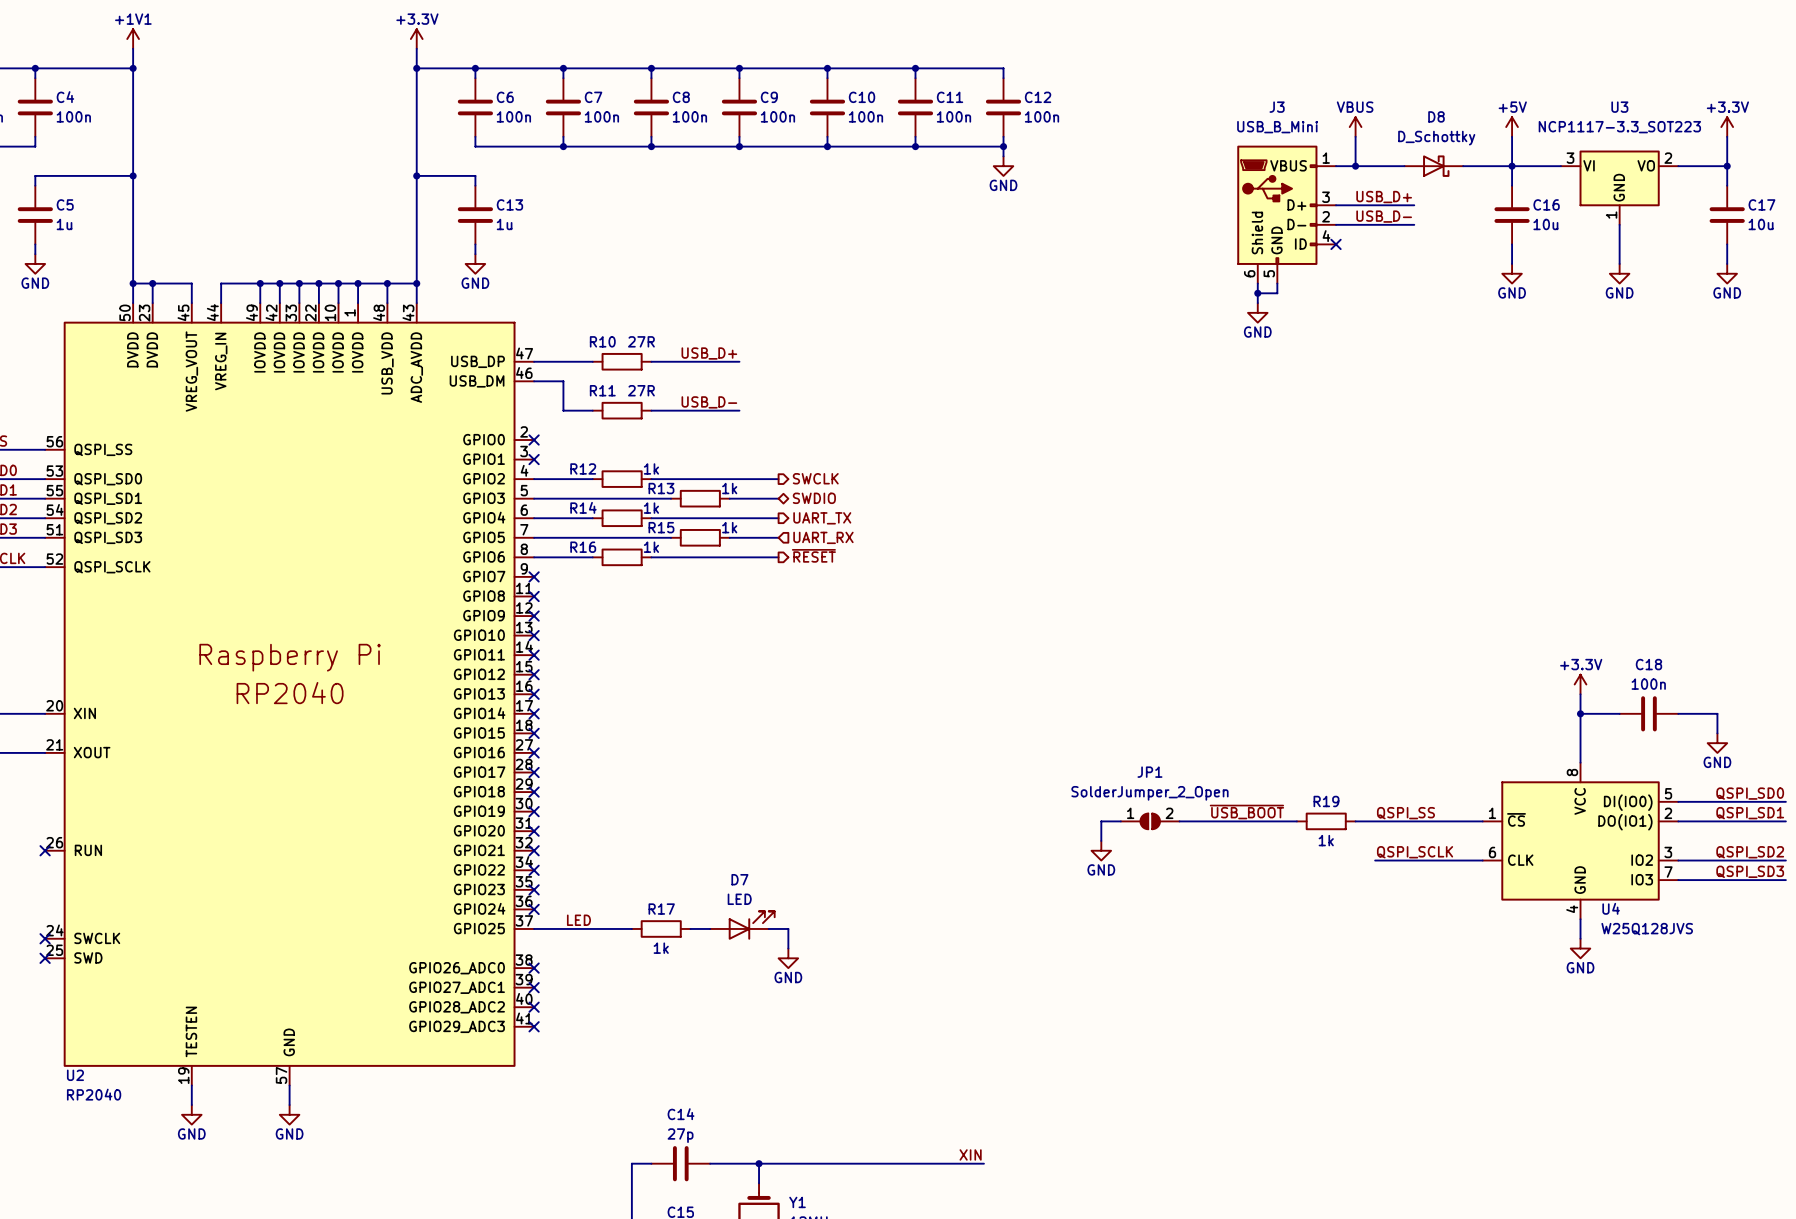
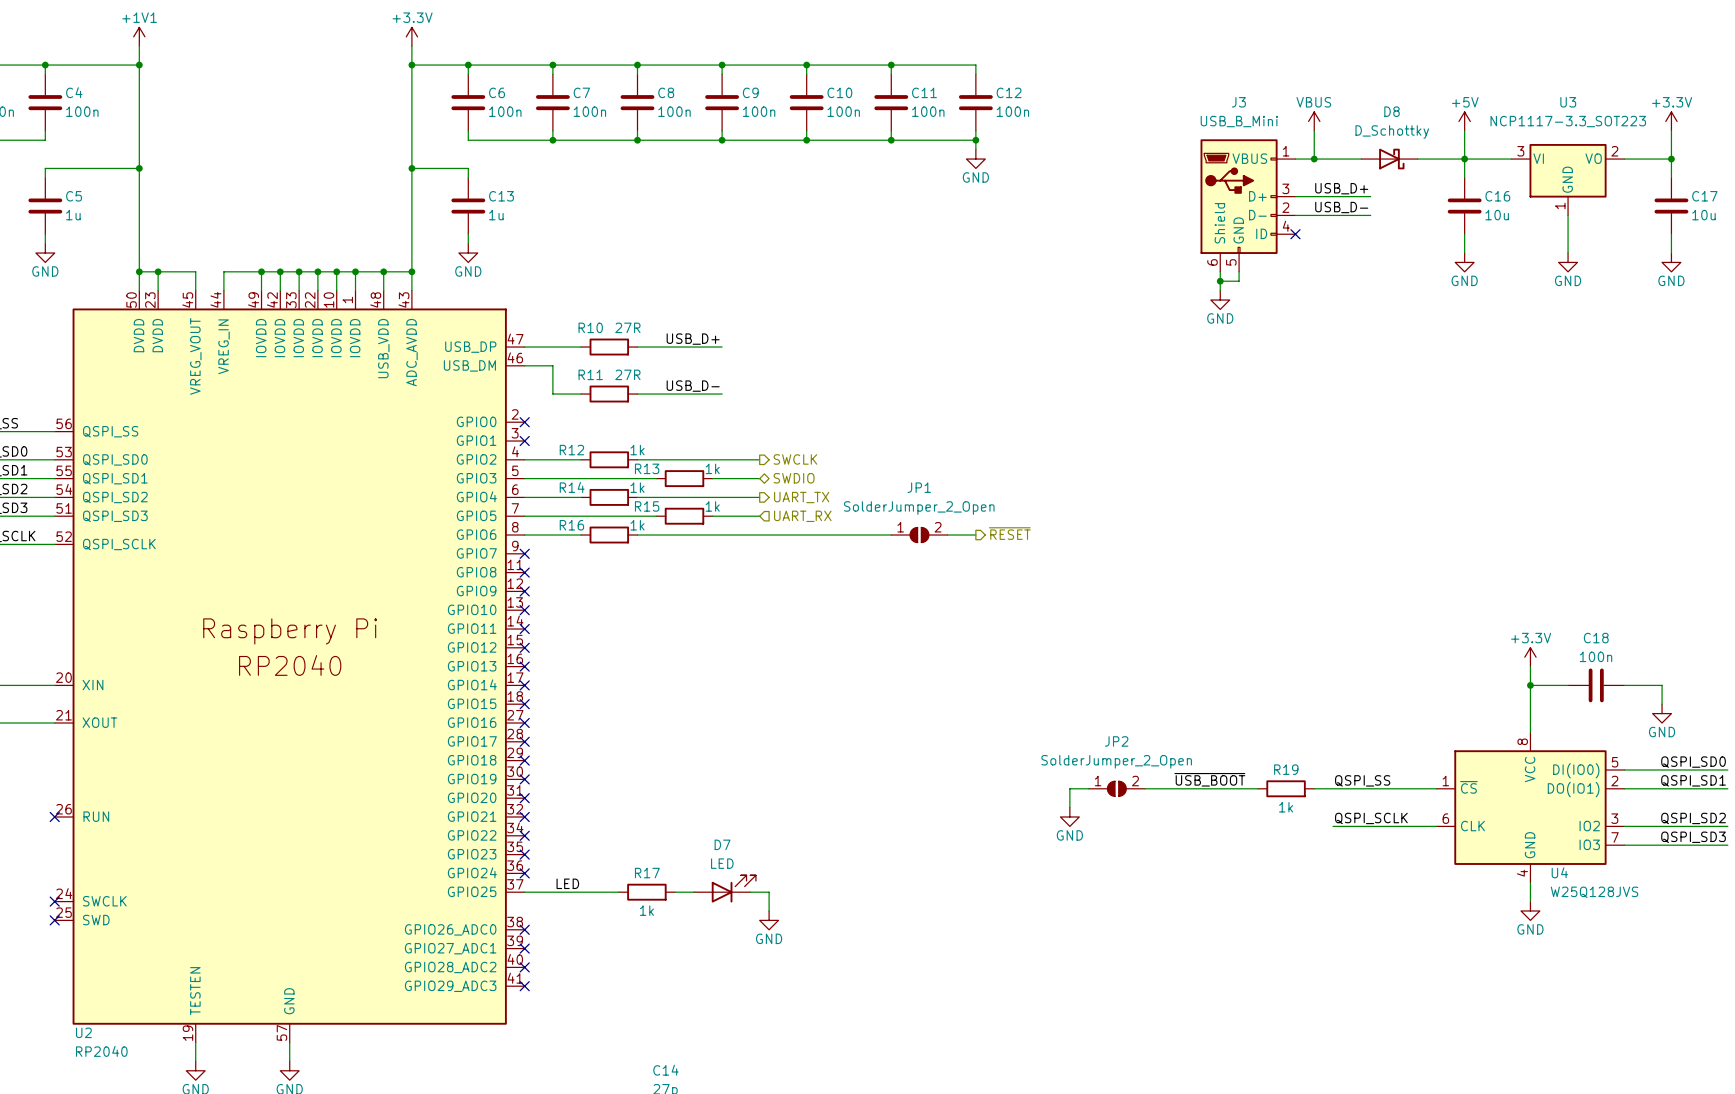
hierarchical label: ~{RESET} (813, 555) -> none
hierarchical label: none -> ~{RESET} (1009, 533)
wire: none -> (759, 535) (891, 535)
JP1: none -> SolderJumper_2_Open (919, 535)
wire: none -> (947, 535) (975, 535)
JP1 name: JP1 (1149, 772) -> JP2 (1116, 741)

